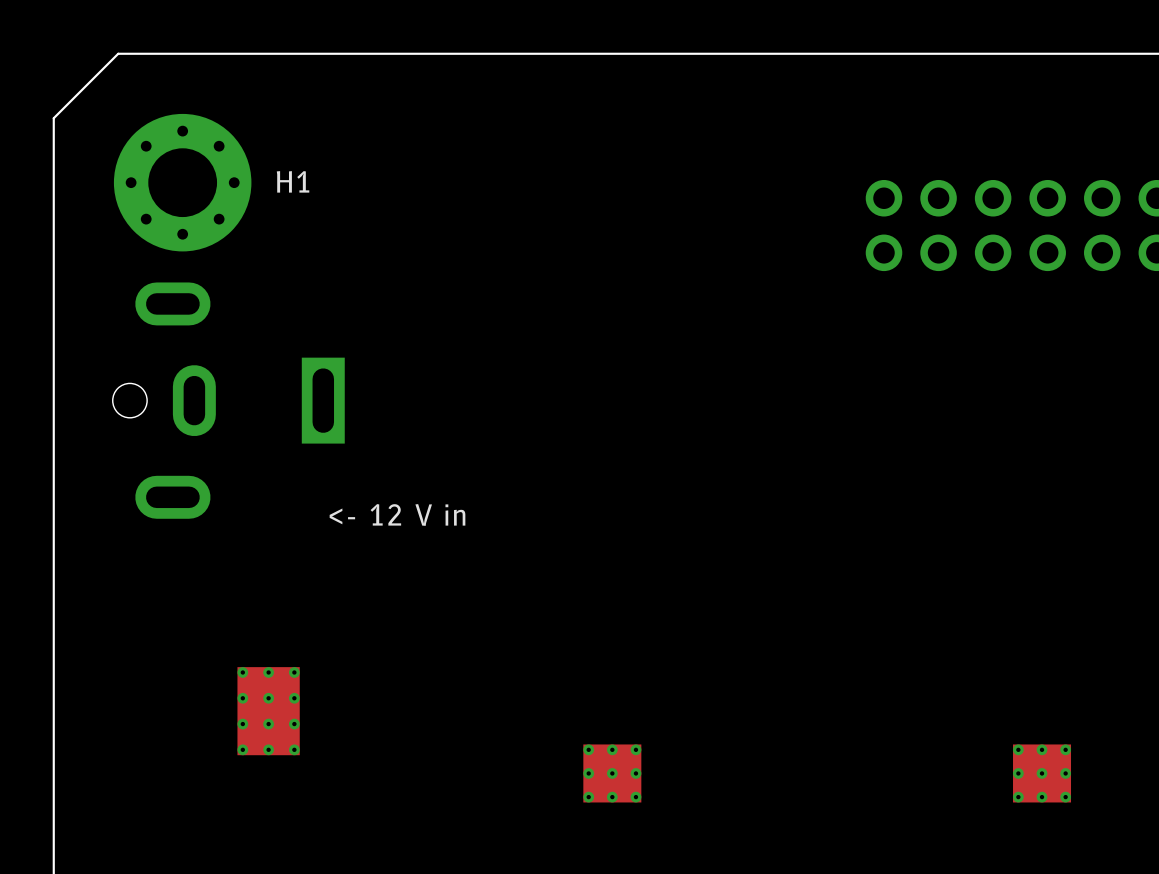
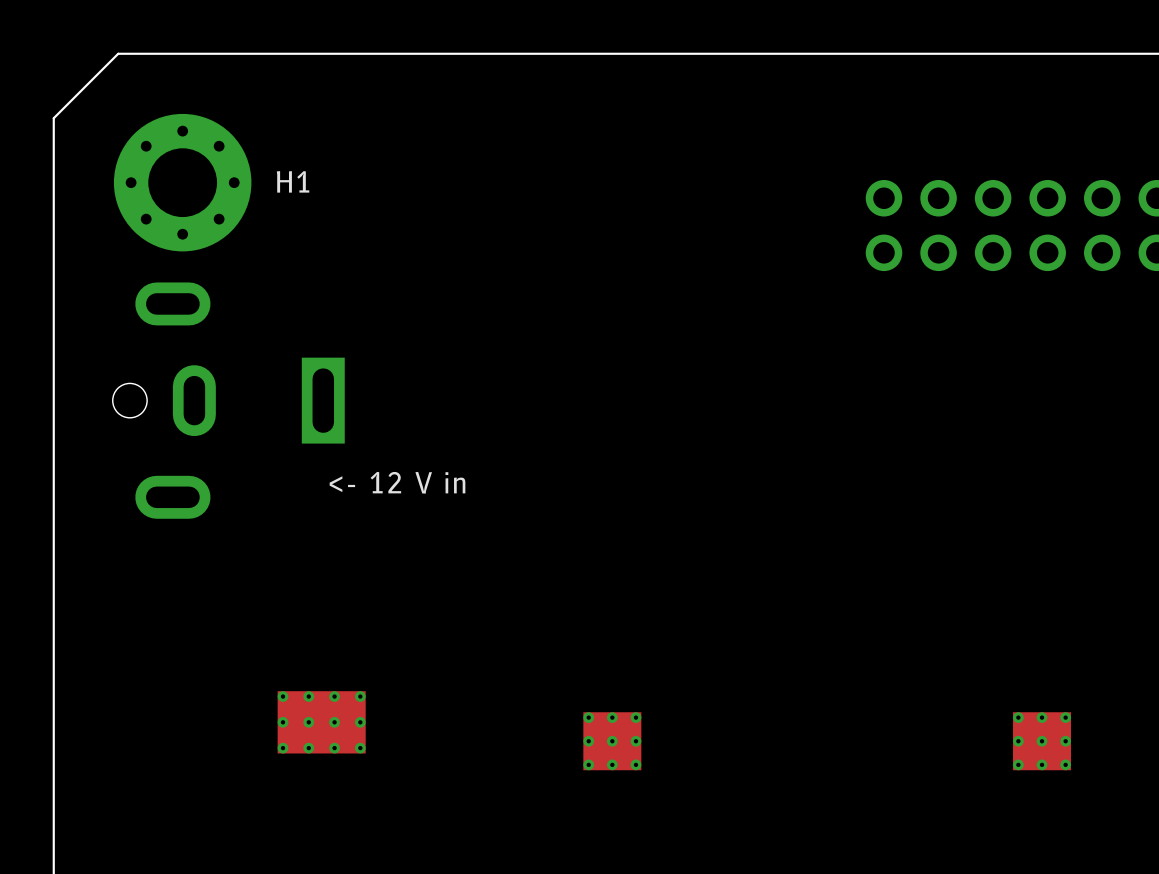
text position: <- 12 V in (397, 515) -> <- 12 V in (397, 482)
part rotation: 0° (268, 711) -> 90° clockwise (321, 722)
part position: (268, 711) -> (321, 722)
part position: (612, 773) -> (612, 741)
part position: (1042, 773) -> (1042, 741)

